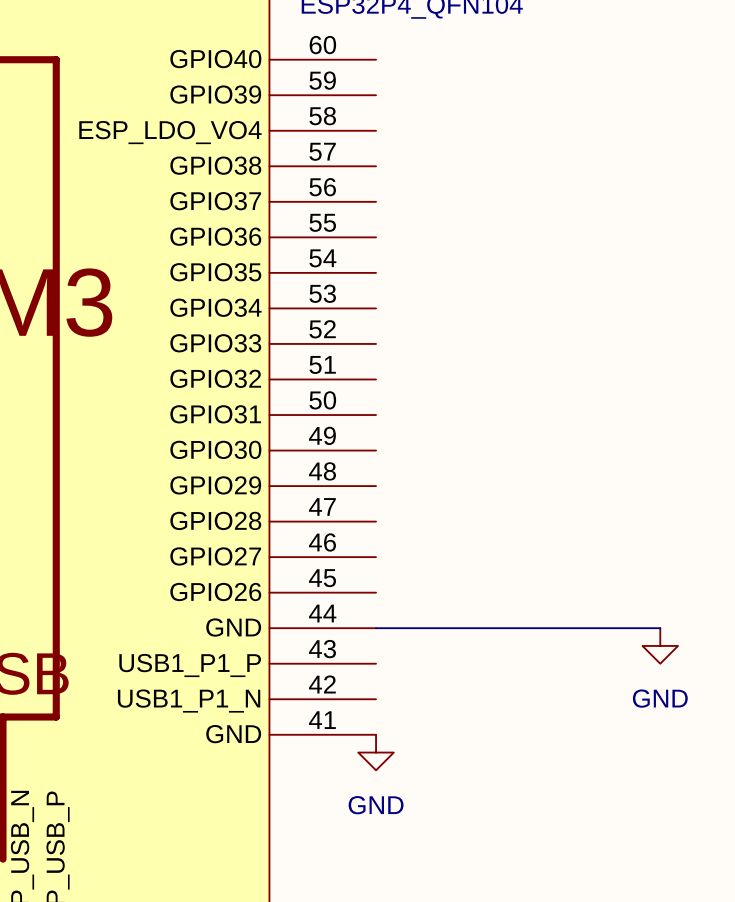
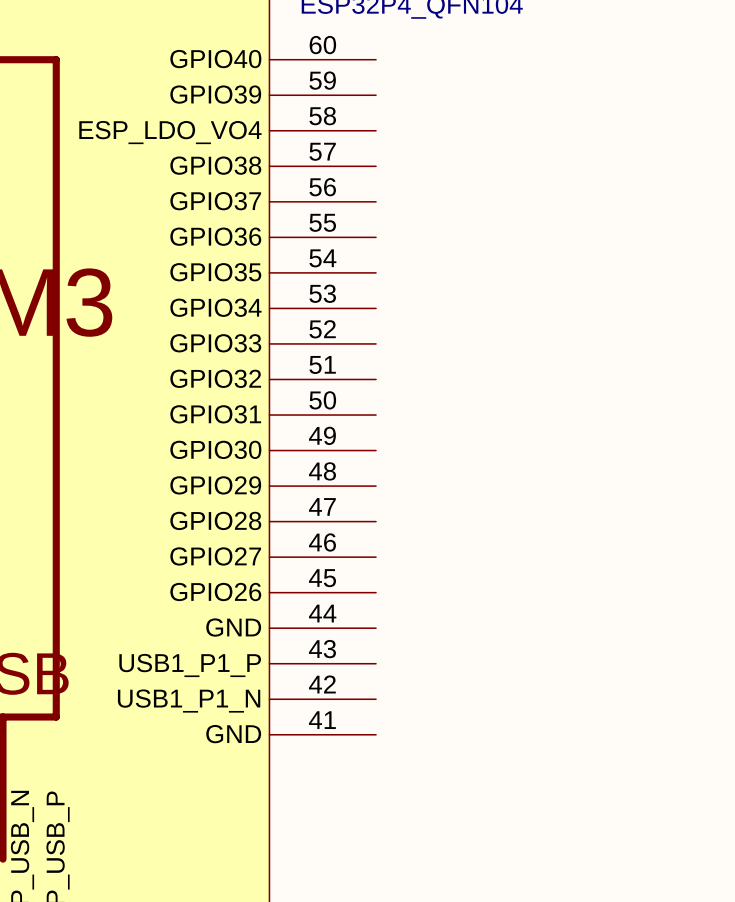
wire: (376, 628) (660, 628) -> none
power symbol: GND (660, 645) -> none
power symbol: GND (376, 752) -> none

